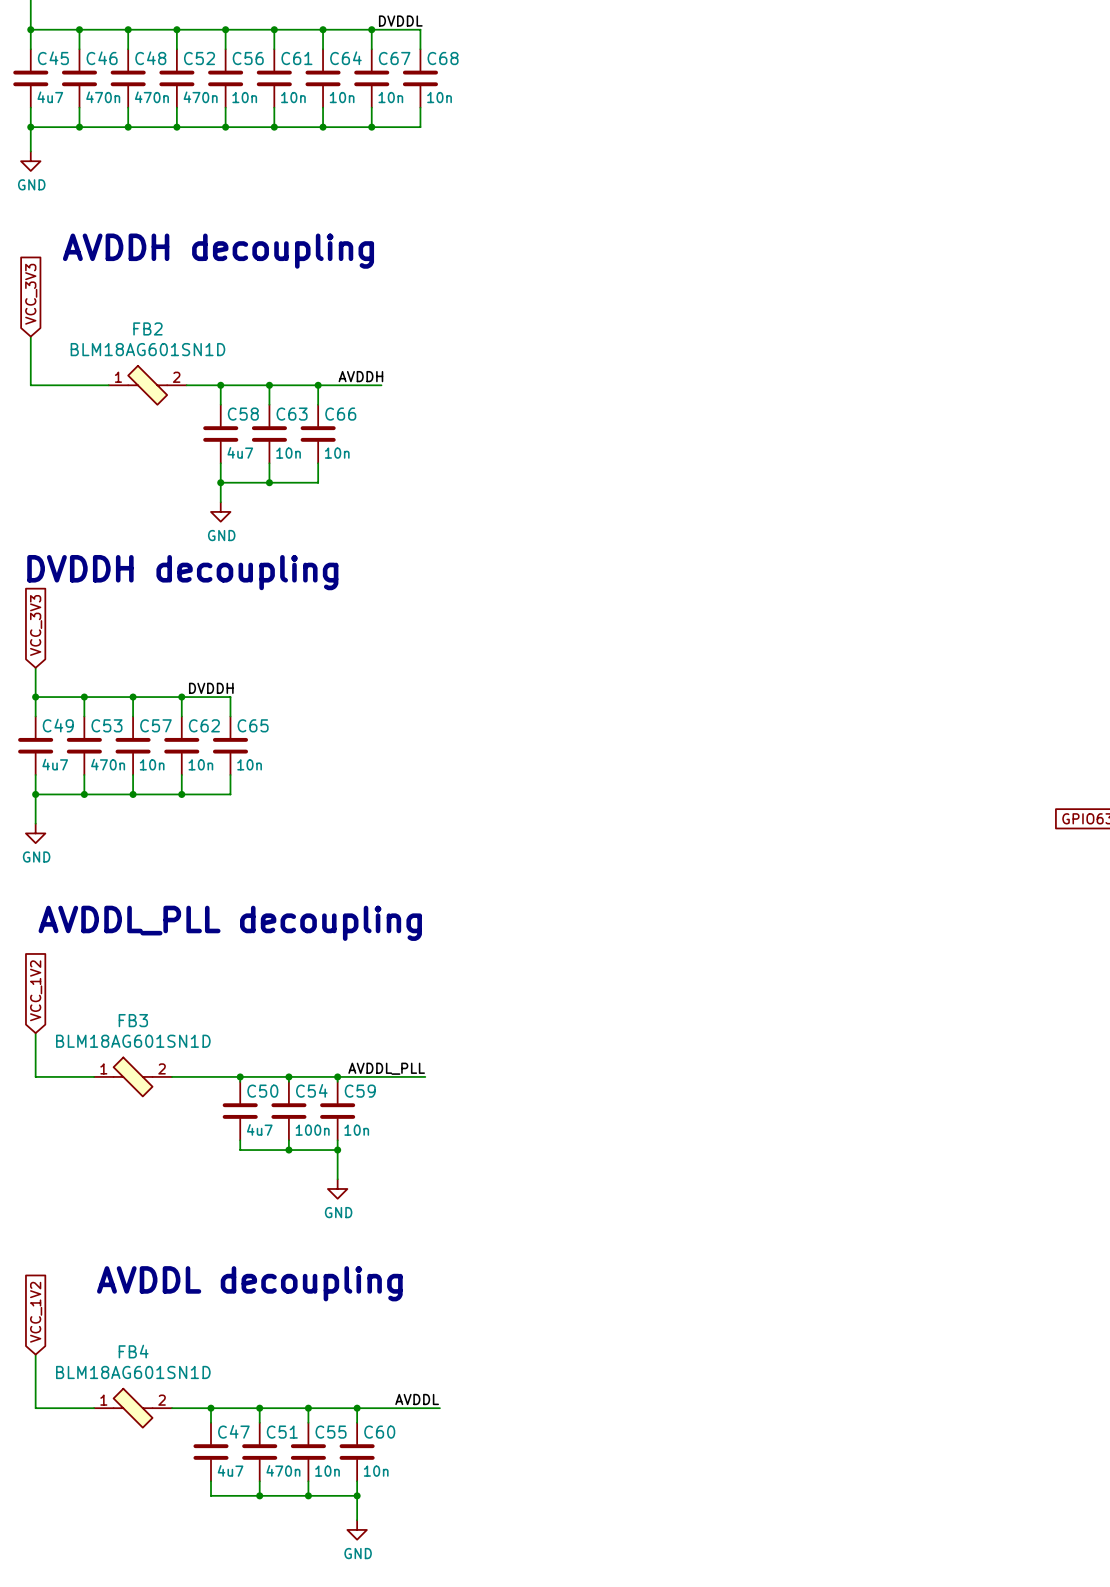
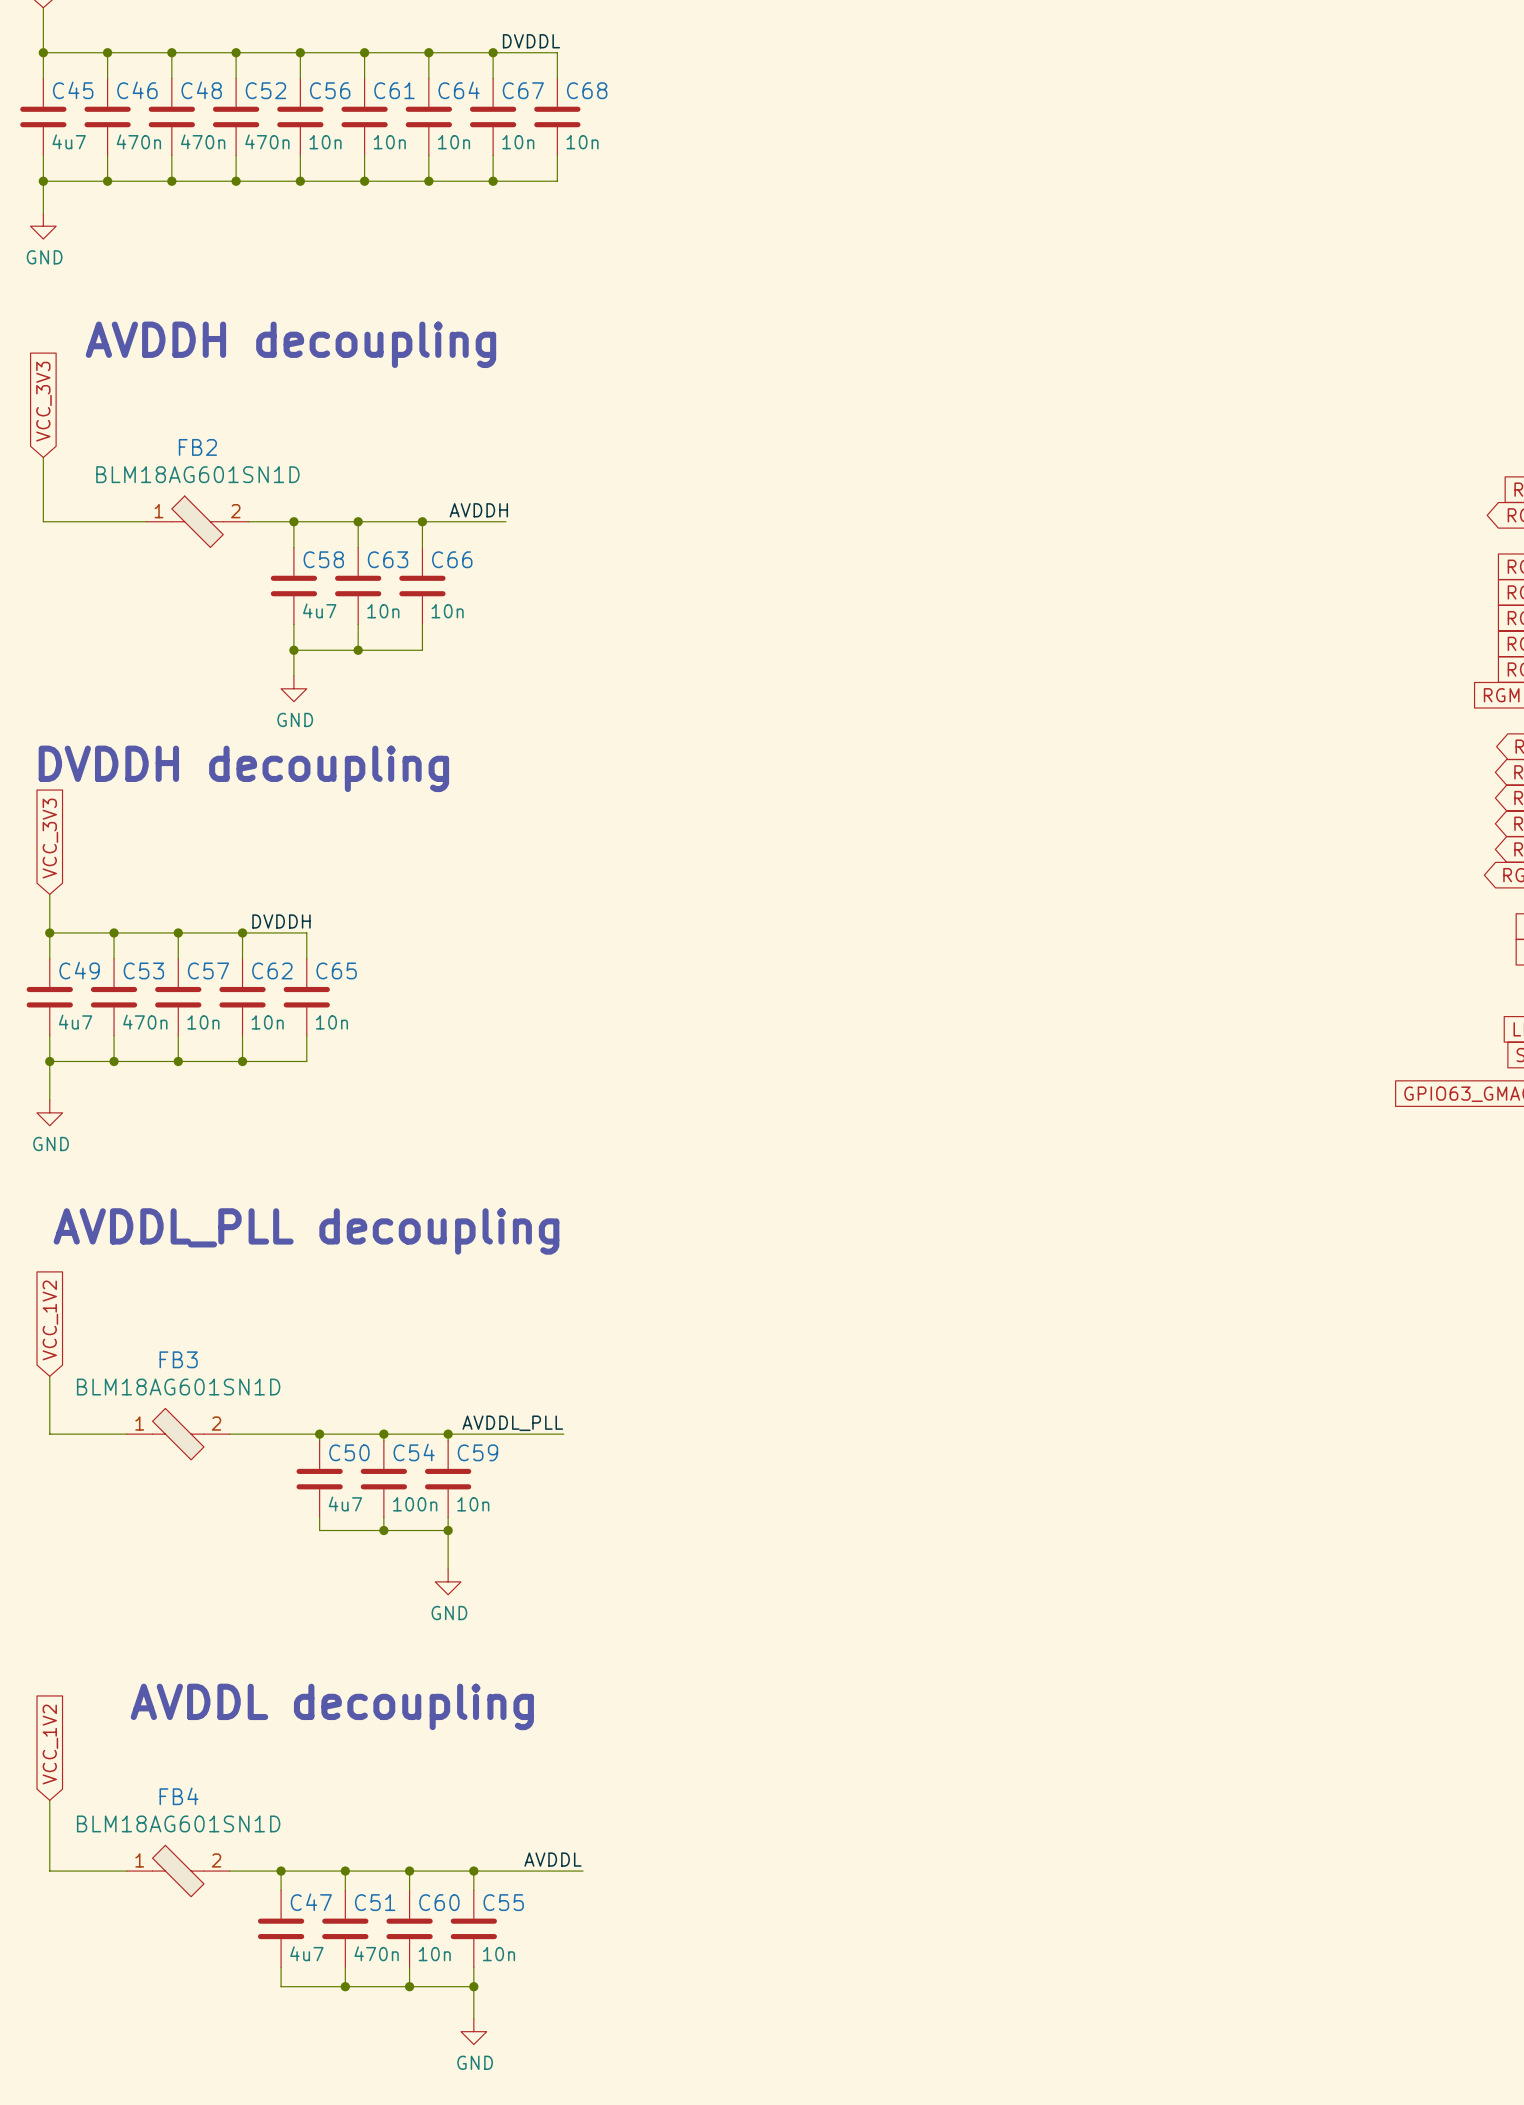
C55 name: C55 (331, 1432) -> C60 (439, 1902)
C60 name: C60 (379, 1432) -> C55 (503, 1902)

